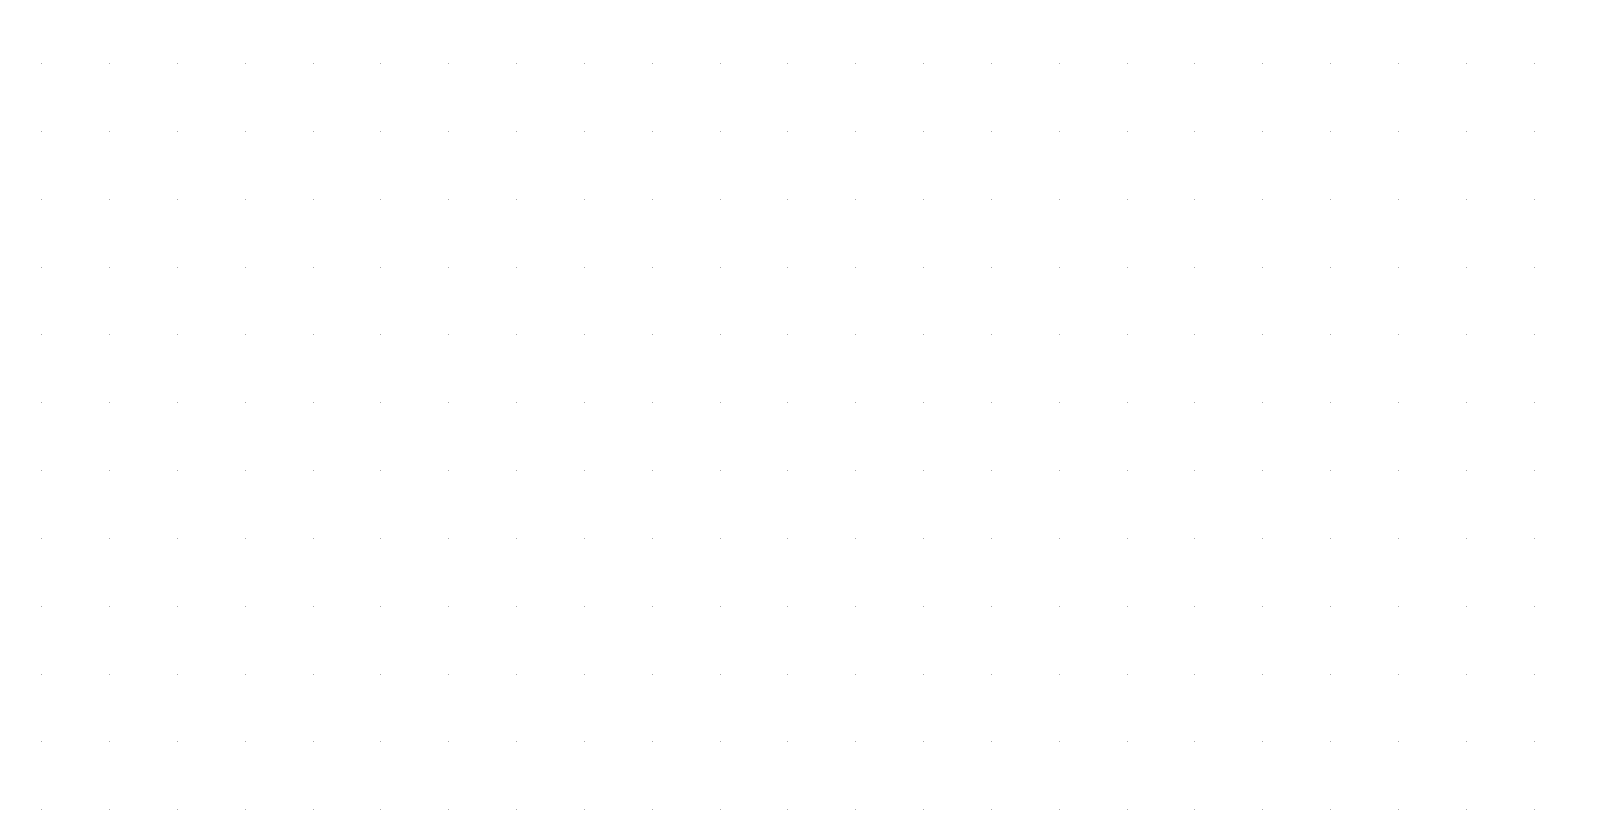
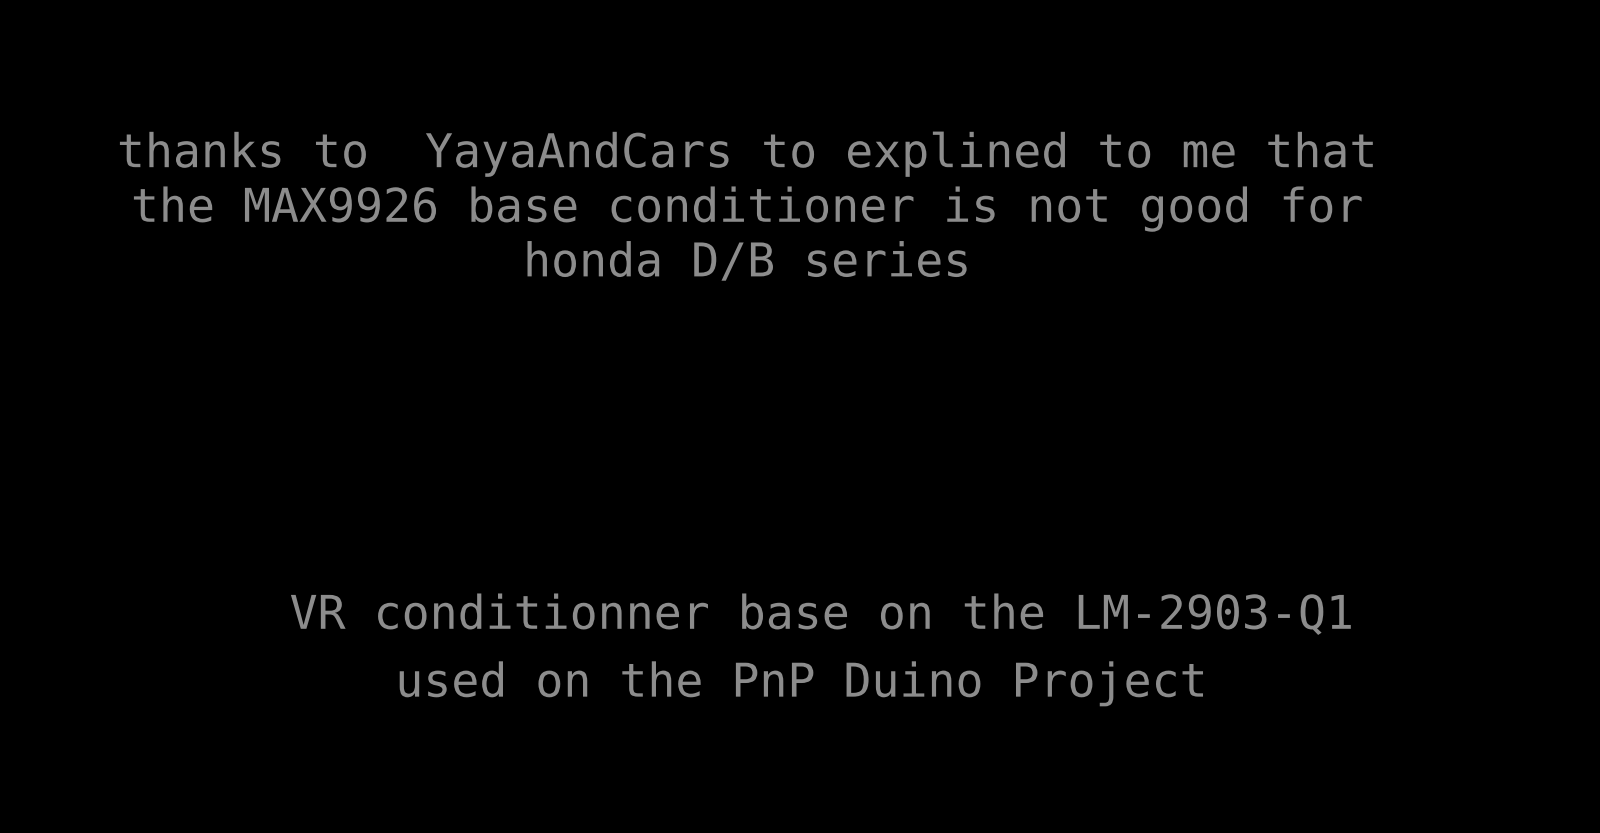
text: none -> thanks to YayaAndCars to explined to me that (746, 154)
text: none -> the MAX9926 base conditioner is not good for (747, 209)
text: none -> honda D/B series (747, 260)
text: none -> VR conditionner base on the LM-2903-Q1 (820, 614)
text: none -> used on the PnP Duino Project (801, 683)

